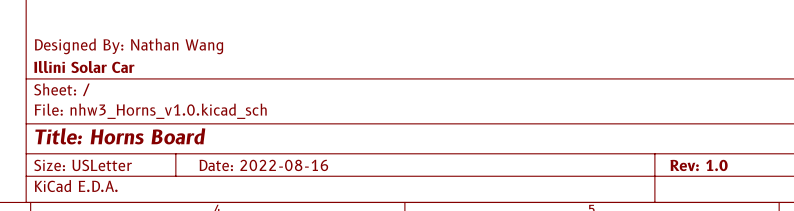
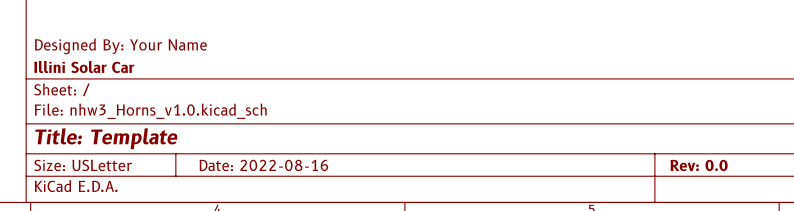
title block: Designed By: Nathan Wang (129, 46) -> Designed By: Your Name (120, 46)
title block: Title: Horns Board (120, 136) -> Title: Template (106, 138)
title block: Rev: 1.0 (699, 165) -> Rev: 0.0 (699, 165)

